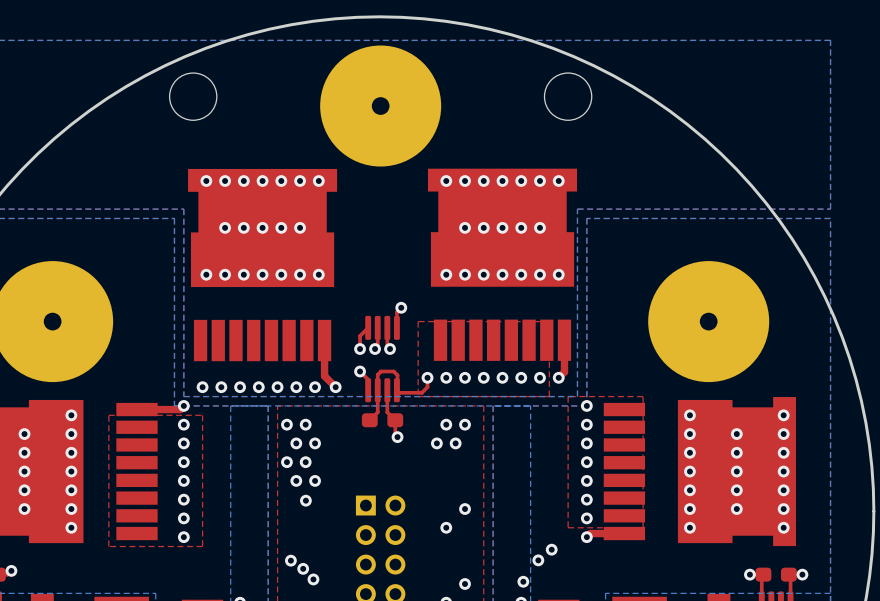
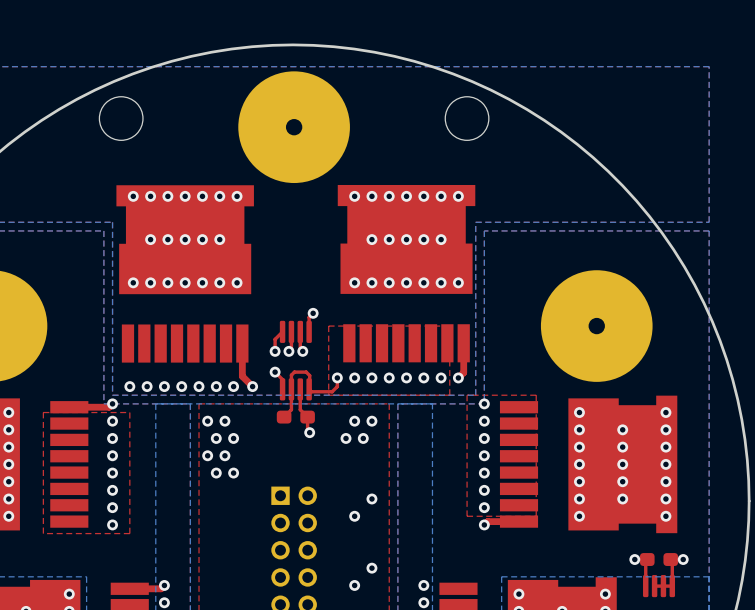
via: (305, 500) -> none
via: (551, 549) -> none
via: (290, 560) -> none
via: (538, 560) -> none
via: (303, 568) -> none
via: (313, 579) -> none
via: (523, 581) -> none

